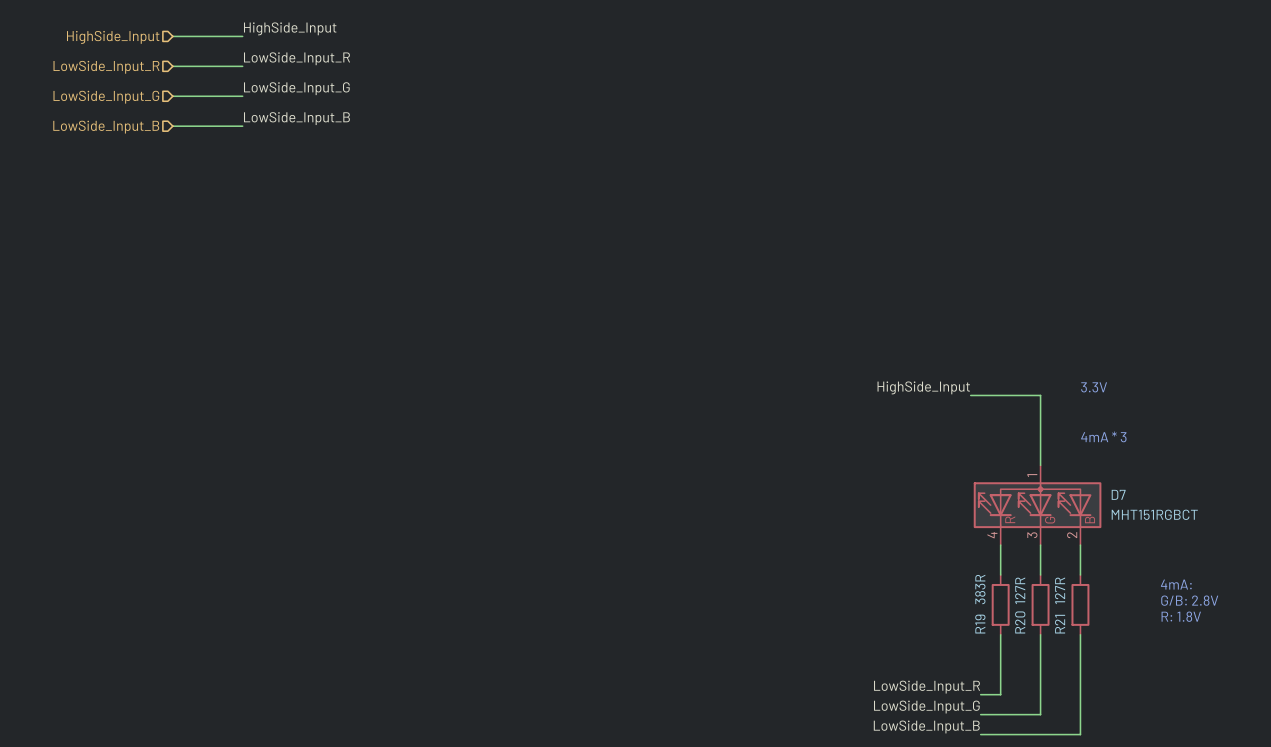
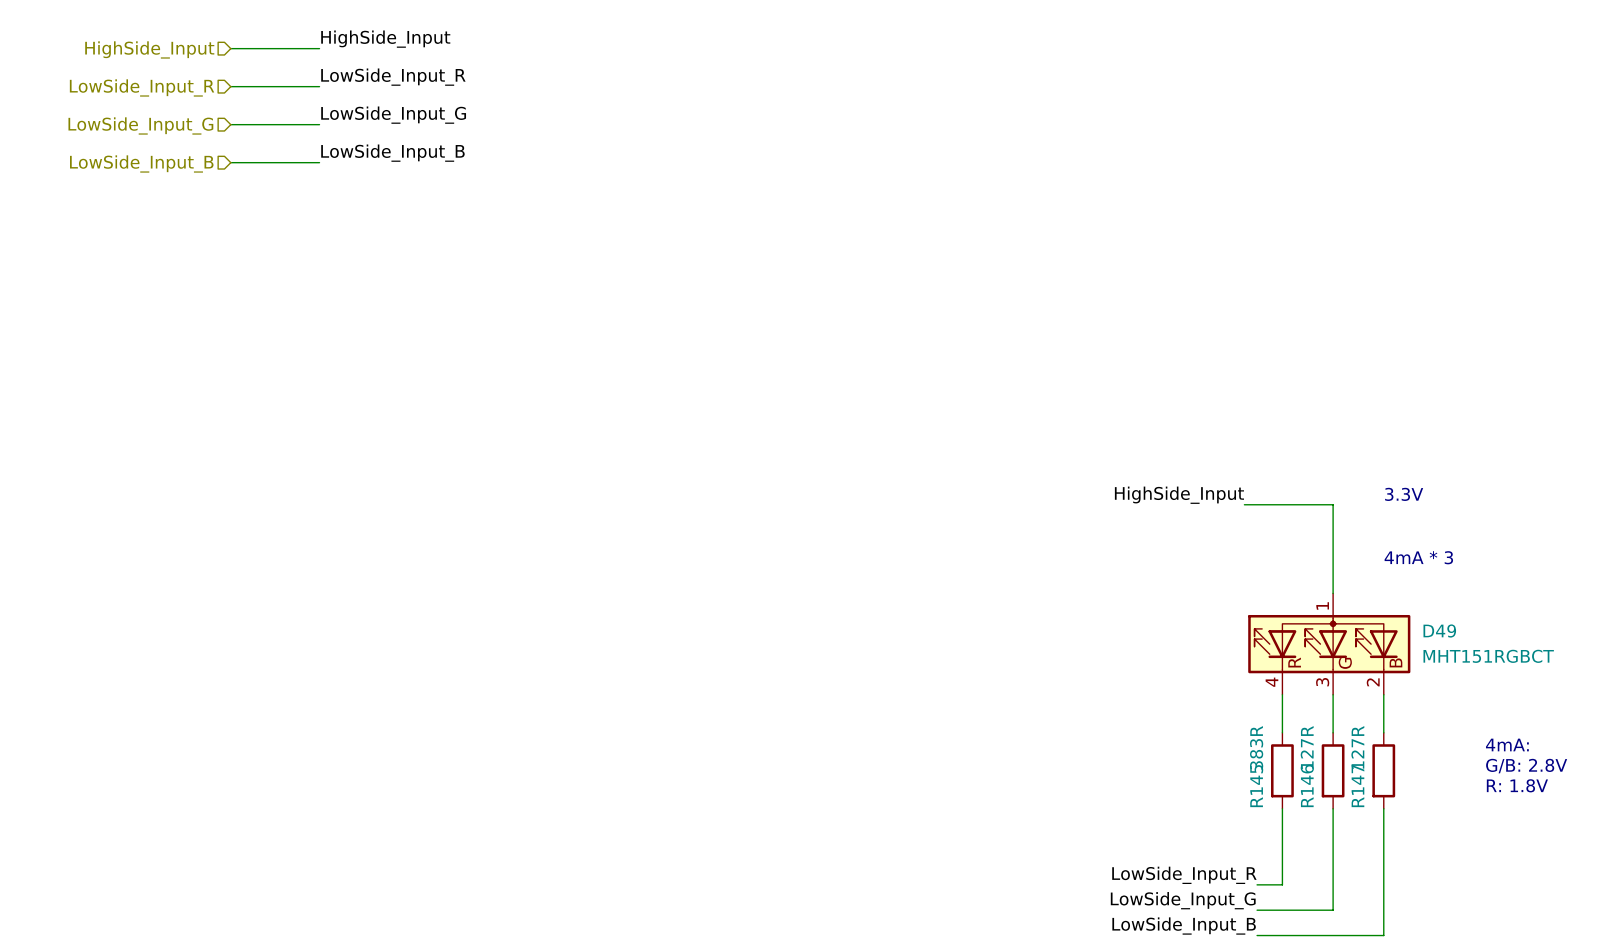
D7 name: D7 (1118, 494) -> D49 (1439, 630)
R20 name: R20 (1020, 622) -> R146 (1307, 785)
R19 name: R19 (980, 624) -> R145 (1256, 786)
R21 name: R21 (1060, 624) -> R147 (1357, 786)

